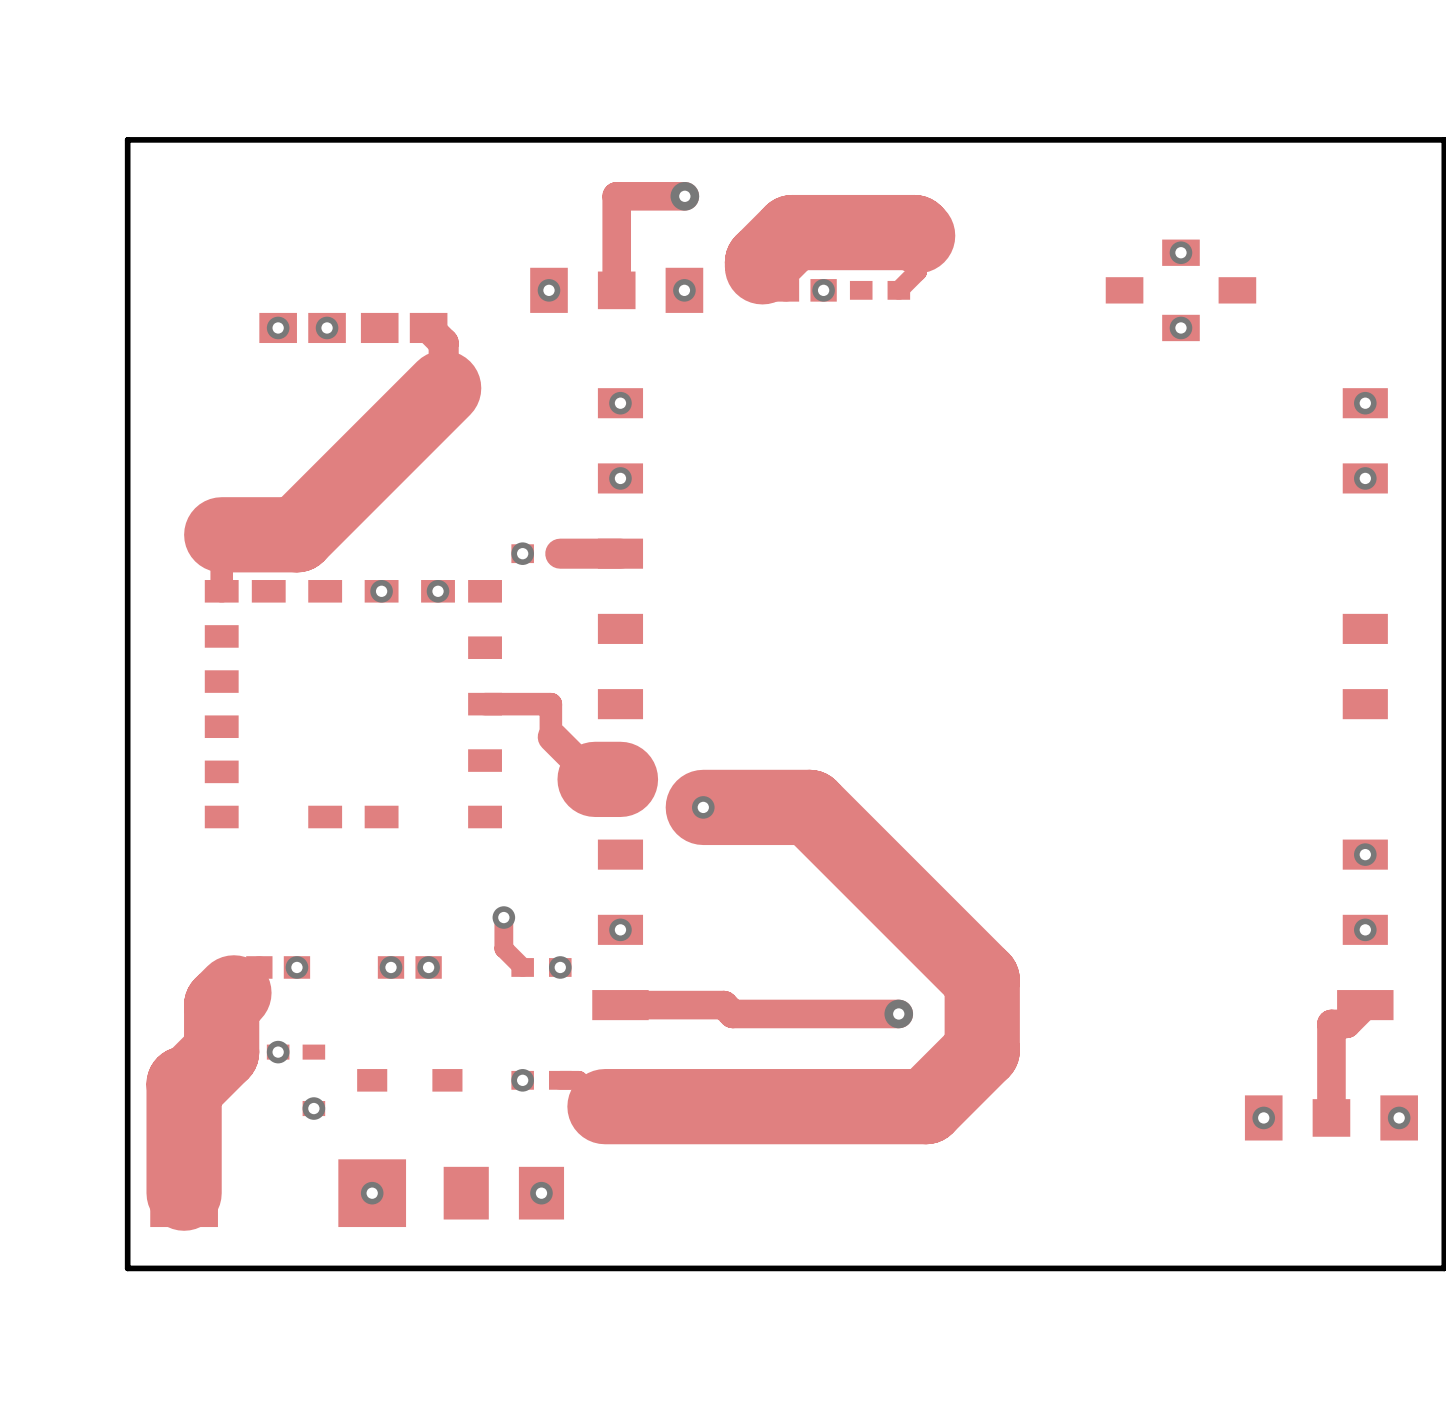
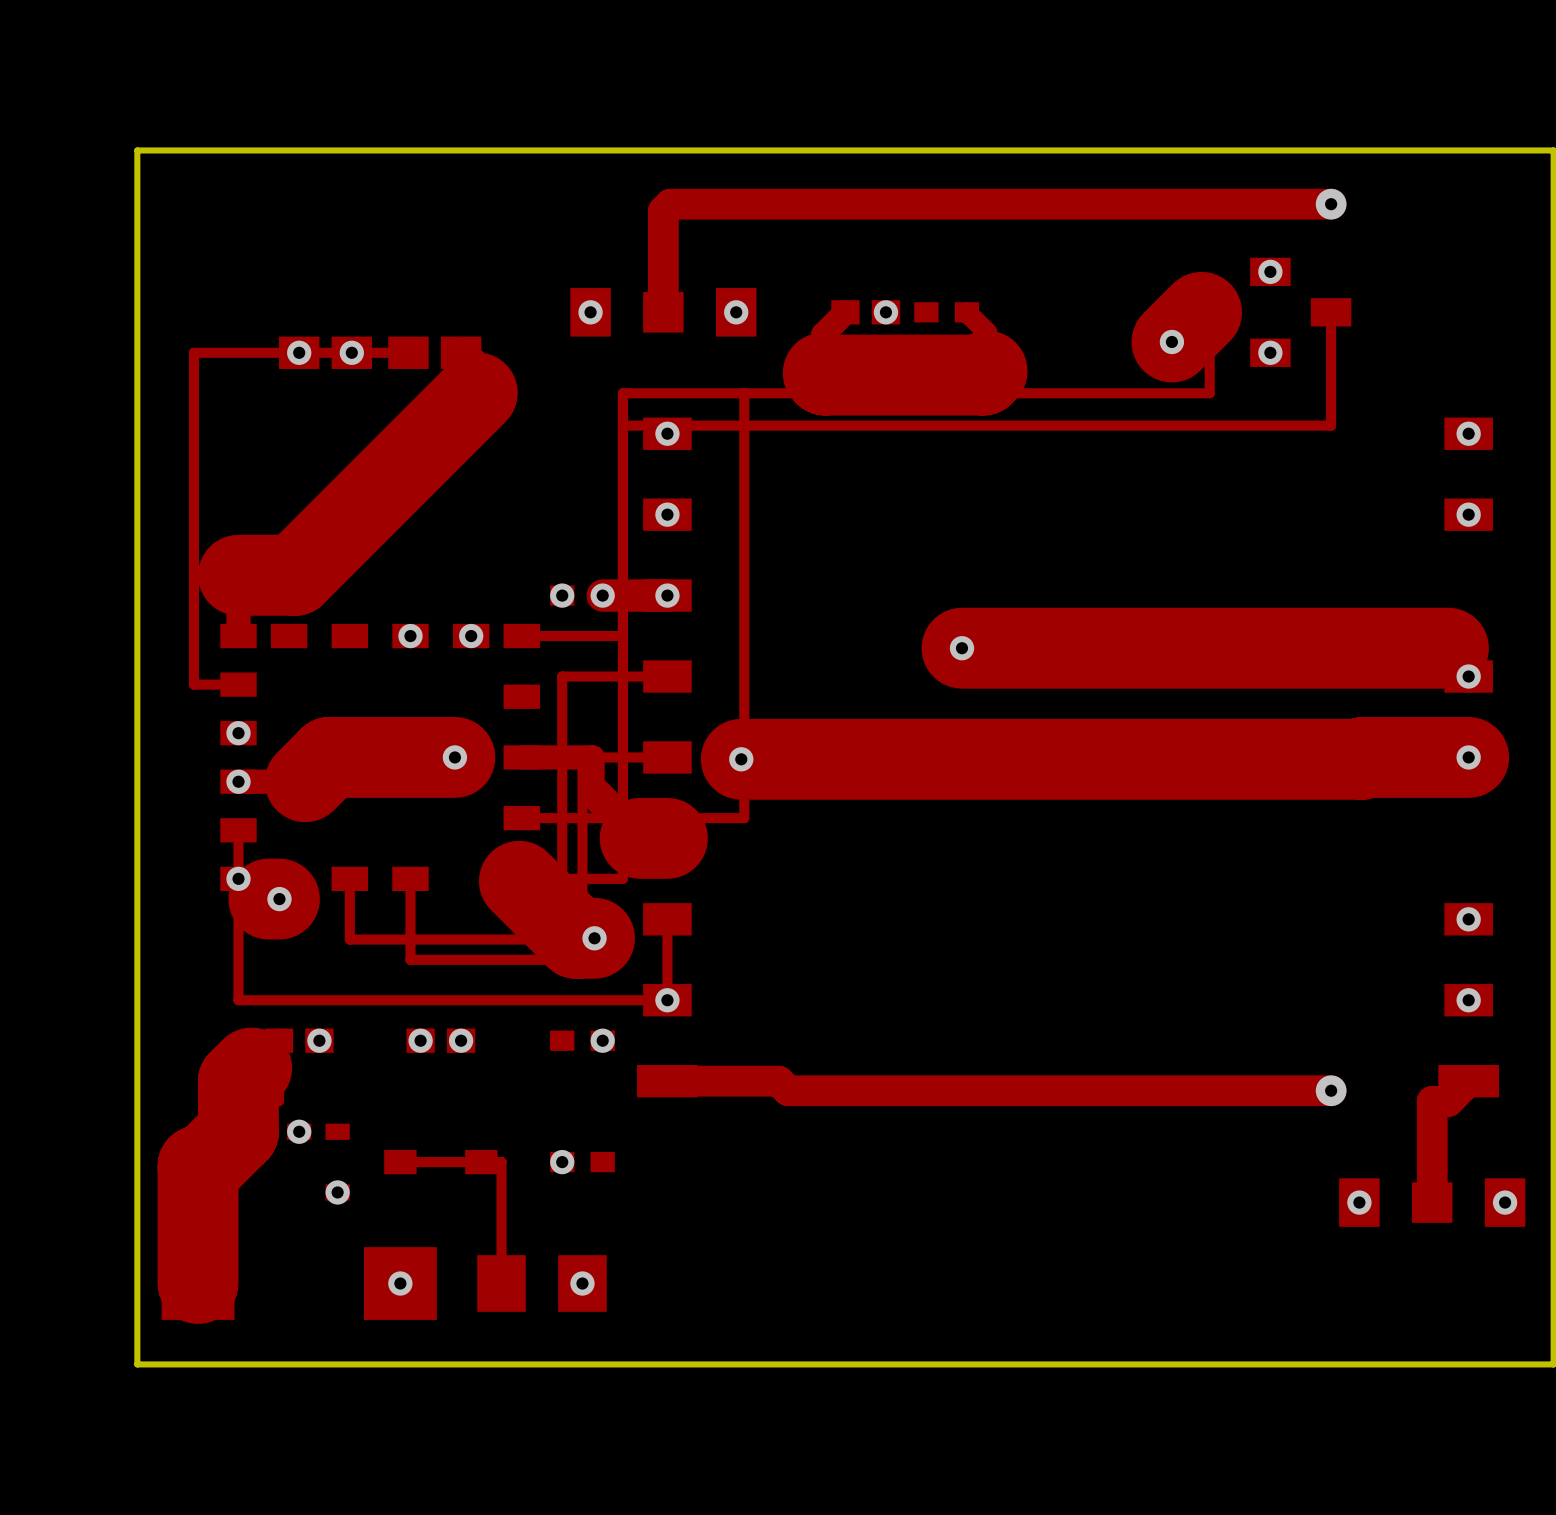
via: none -> (1331, 204)
track: (616, 196) (684, 196) -> (663, 211) (670, 204) (1331, 204)
via: (684, 196) -> none
track: (785, 290) (762, 266) (762, 262) (792, 232) (914, 232) (917, 235) (917, 271) (898, 290) -> (845, 312) (823, 334) (823, 373) (825, 375) (983, 375) (987, 371) (987, 332) (966, 312)
track: none -> (1331, 312) (1331, 425) (622, 425)
track: none -> (1171, 341) (1201, 312) (1209, 312) (1209, 393) (622, 393) (622, 878) (521, 878) (519, 881) (576, 938) (594, 938)
via: none -> (1171, 341)
track: none -> (408, 352) (193, 352) (193, 684) (238, 684)
track: none -> (744, 393) (744, 818) (521, 818)
track: (443, 388) (297, 534) (274, 534) -> (477, 392) (294, 575)
via: none -> (602, 595)
via: none -> (667, 595)
track: none -> (521, 636) (622, 636)
track: none -> (962, 648) (1448, 648) (1468, 668) (1468, 676)
via: none -> (962, 648)
track: none -> (667, 676) (562, 676) (562, 959) (410, 959) (410, 878)
via: none -> (1468, 676)
via: none -> (238, 733)
track: none -> (454, 757) (329, 757) (305, 781) (238, 781)
via: none -> (454, 757)
track: none -> (667, 757) (582, 757) (582, 939) (349, 939) (349, 878)
track: none -> (1468, 757) (1363, 757) (1361, 759) (741, 759)
via: none -> (1468, 757)
via: none -> (741, 759)
via: none -> (238, 781)
track: none -> (238, 830) (238, 1000) (667, 1000) (667, 919)
track: (703, 807) (809, 807) (982, 979) (982, 1050) (926, 1106) (604, 1106) (578, 1080) (560, 1080) -> none
via: (703, 807) -> none
track: none -> (238, 878) (248, 878) (268, 899) (279, 899)
via: none -> (238, 878)
via: none -> (279, 899)
track: (503, 917) (503, 948) (522, 967) -> none
via position: (503, 917) -> (594, 938)
track: none -> (278, 1040) (278, 1101)
track: none -> (966, 1090) (1331, 1090)
via: (898, 1013) -> none
via: none -> (1331, 1090)
track: none -> (400, 1162) (501, 1162) (501, 1283)

